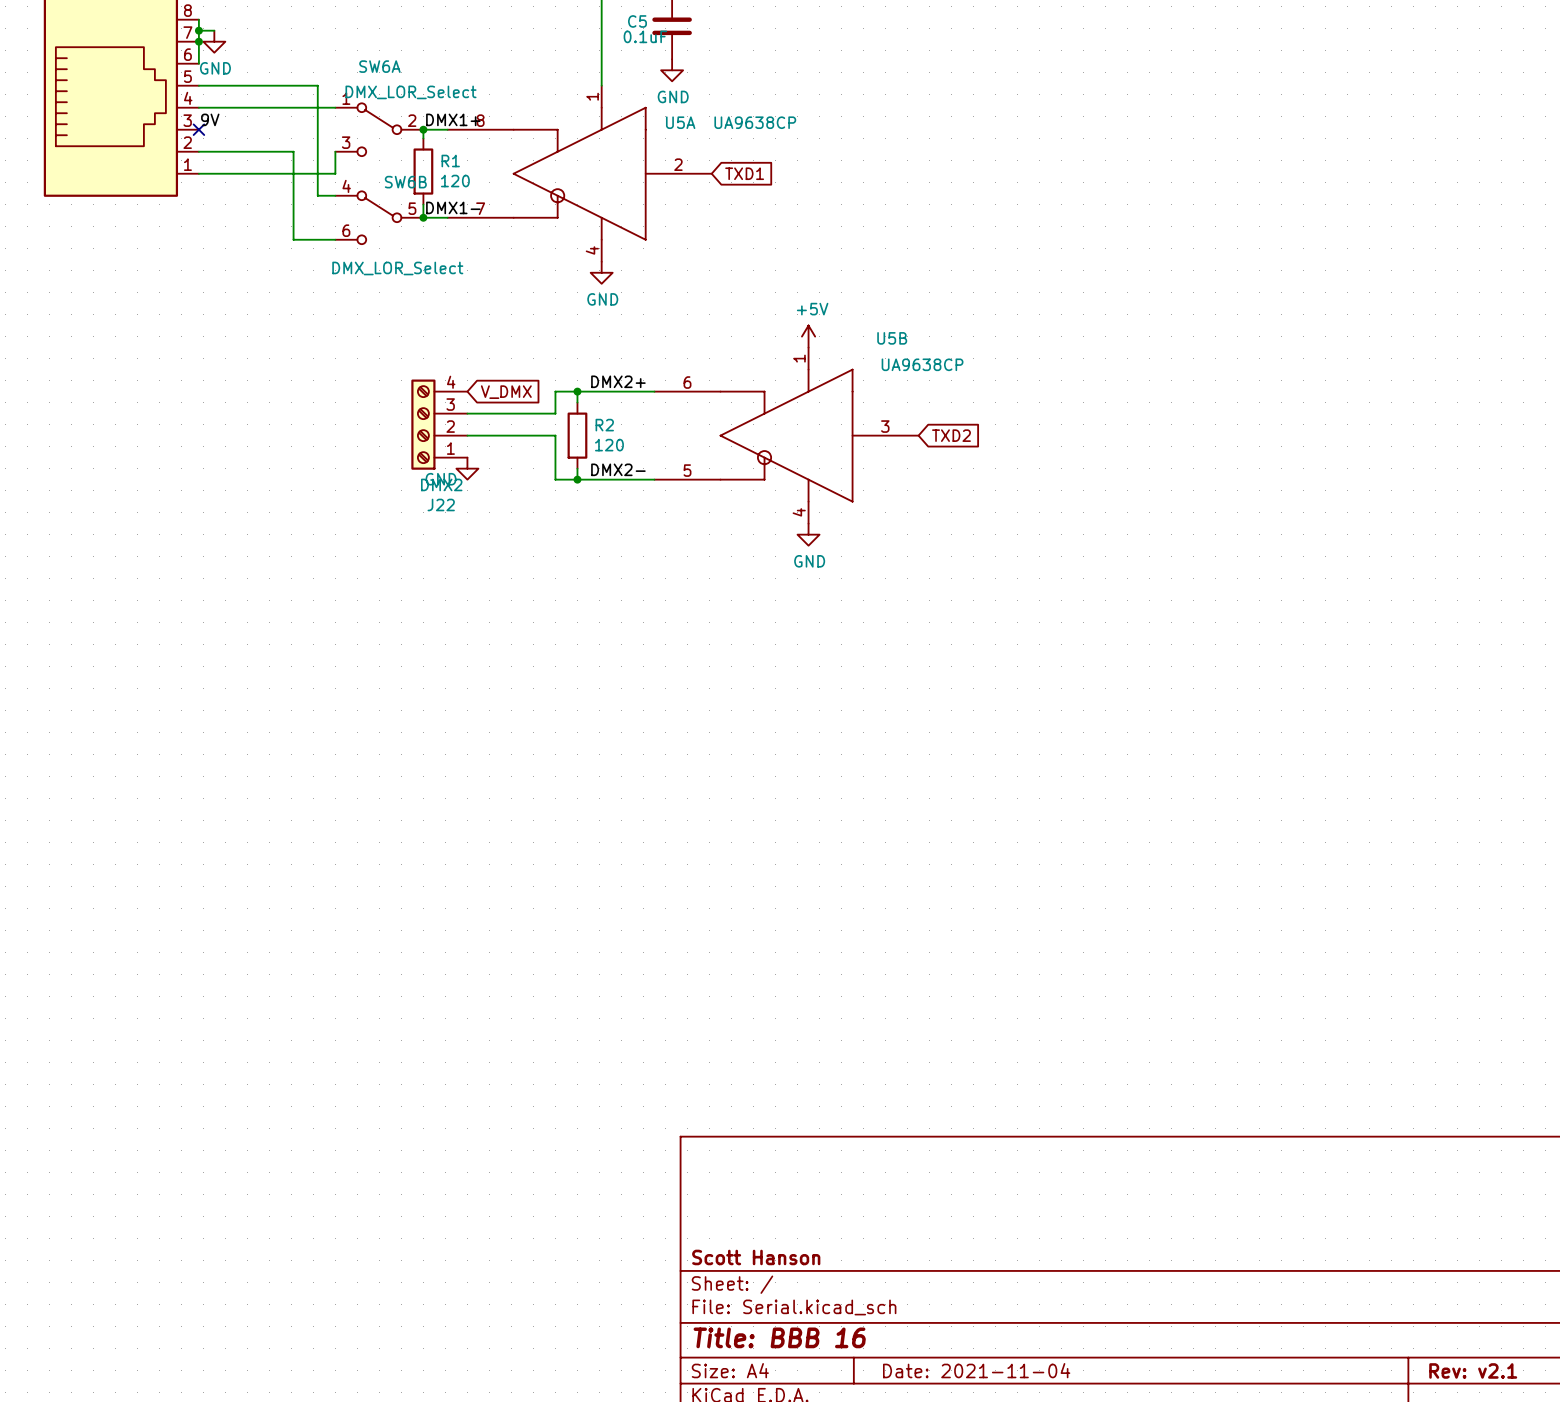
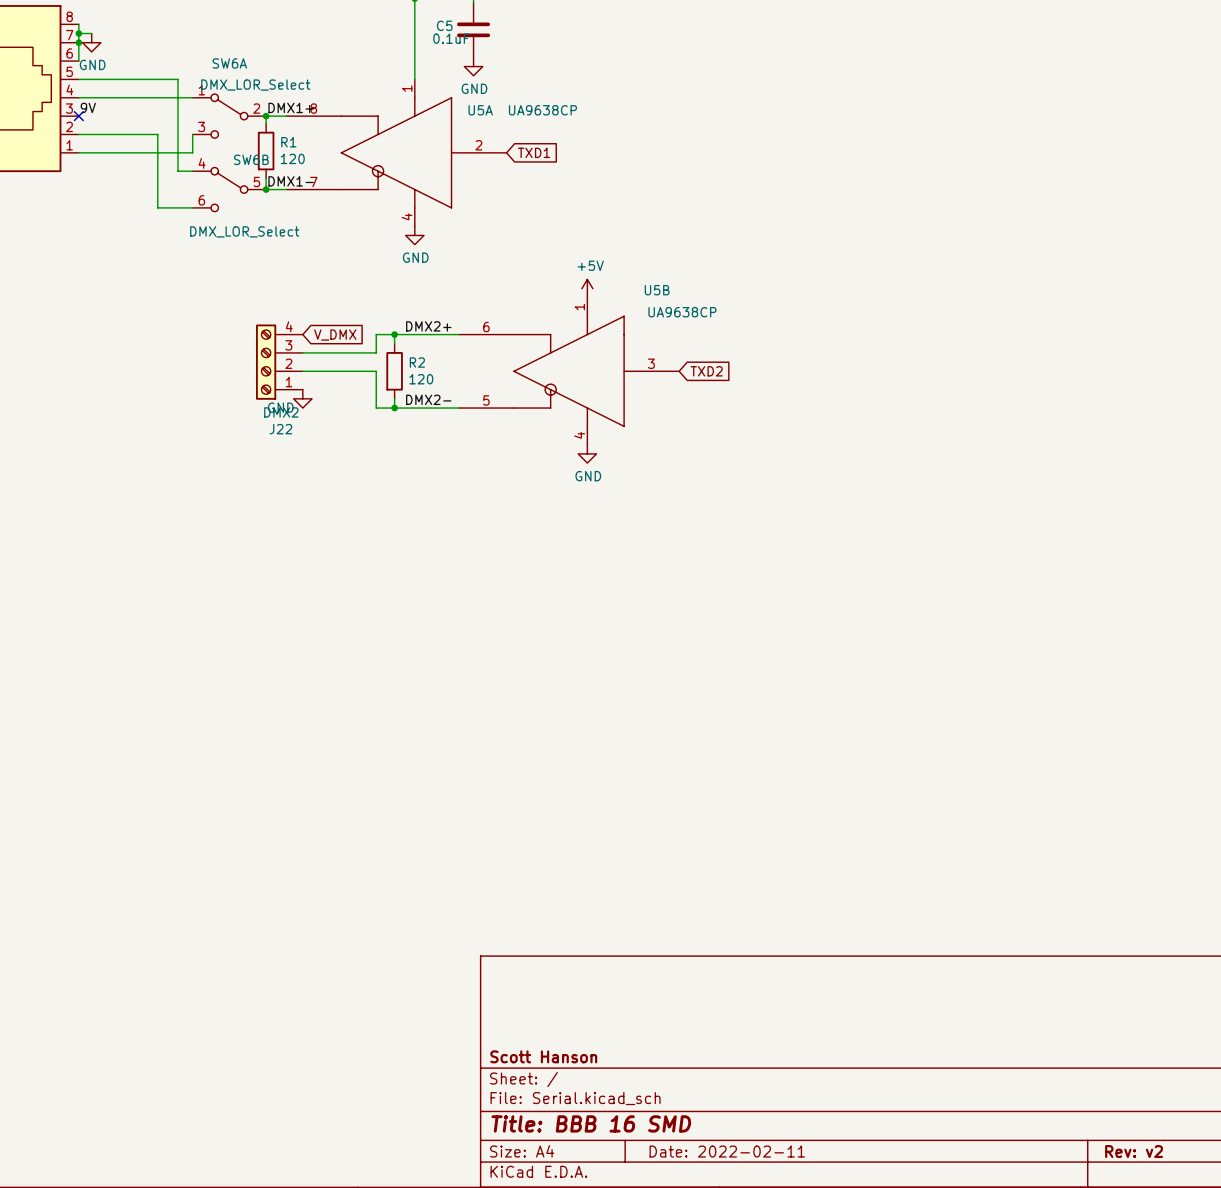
title block: Title: BBB 16 (779, 1337) -> Title: BBB 16 SMD (591, 1123)
title block: Date: 2021-11-04 (976, 1370) -> Date: 2022-02-11 (727, 1151)
title block: Rev: v2.1 (1473, 1370) -> Rev: v2 (1134, 1151)

